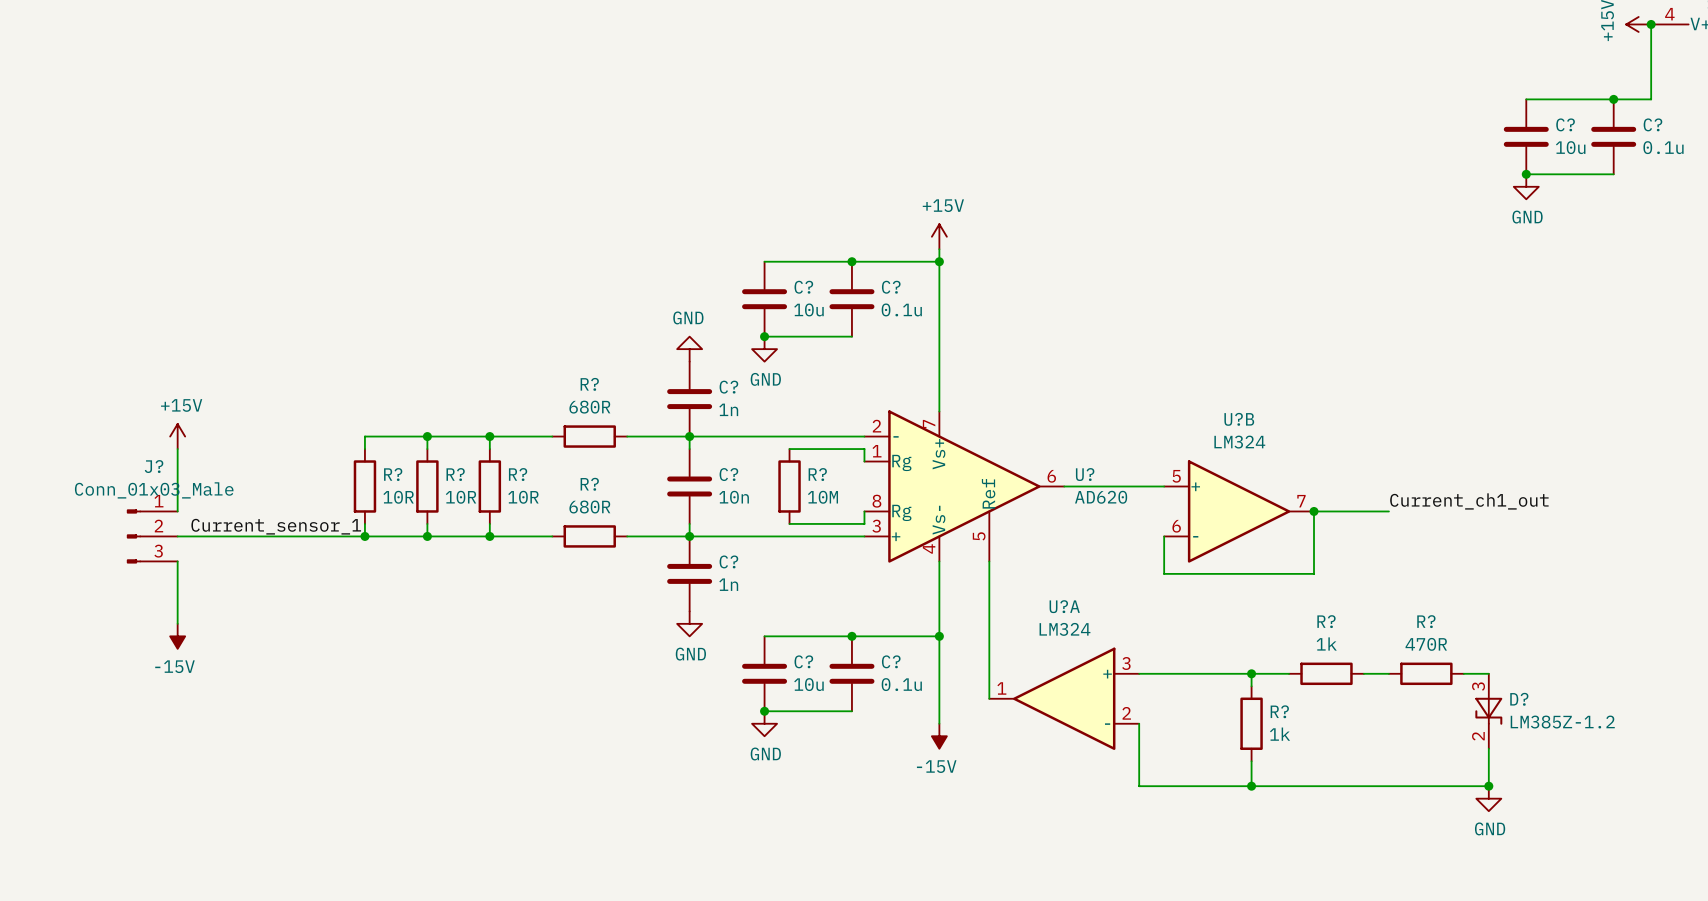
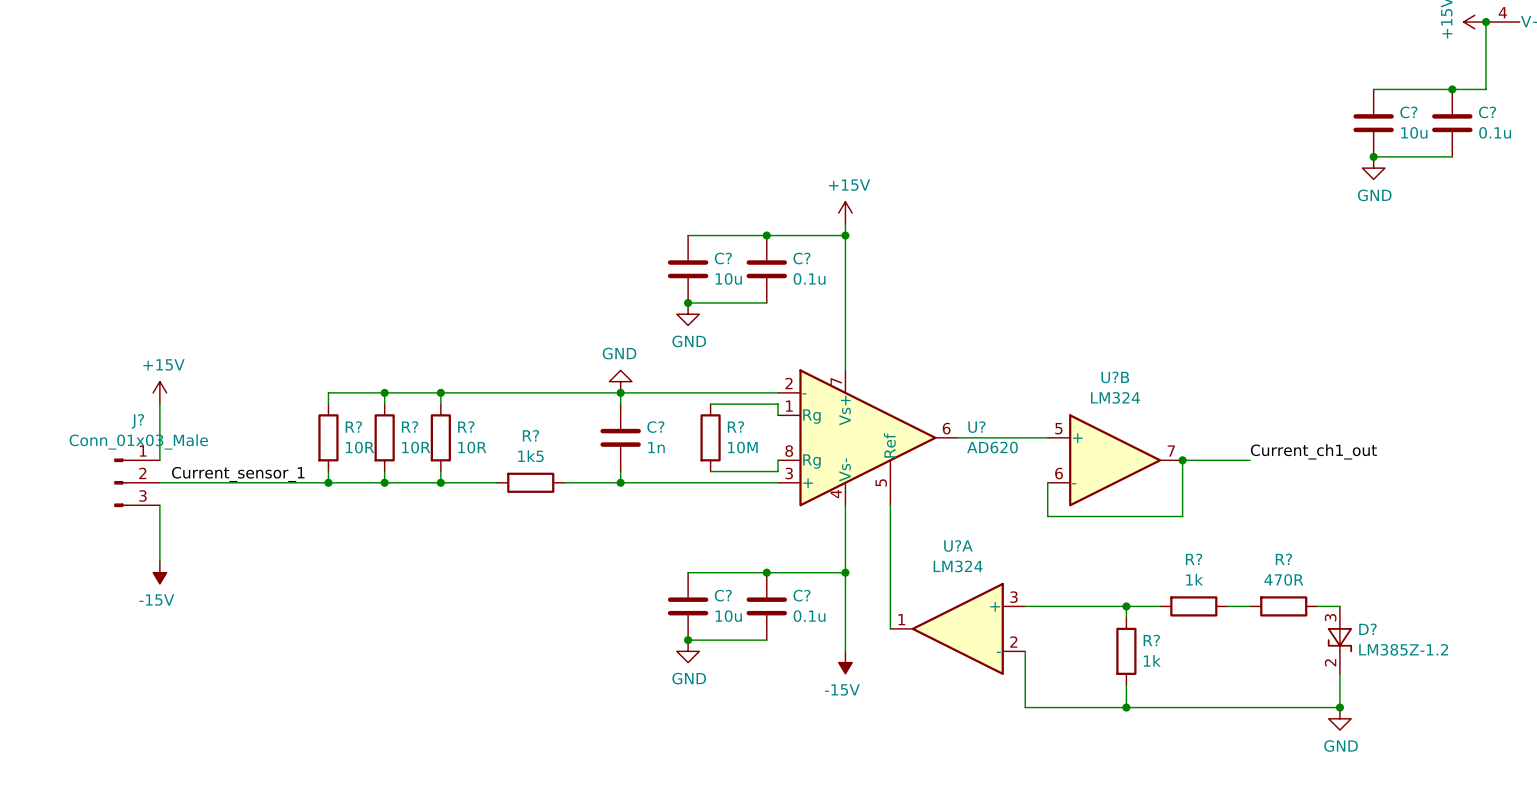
power symbol position: GND (689, 349) -> GND (620, 381)
C?: 1n (689, 399) -> none
wire: none -> (497, 392) (564, 392)
R?: 680R (589, 436) -> none
C? value: 10n (734, 497) -> 1n (656, 447)
R? value: 680R (589, 507) -> 1k5 (530, 456)
C?: 1n (689, 573) -> none
power symbol: GND (689, 623) -> none

